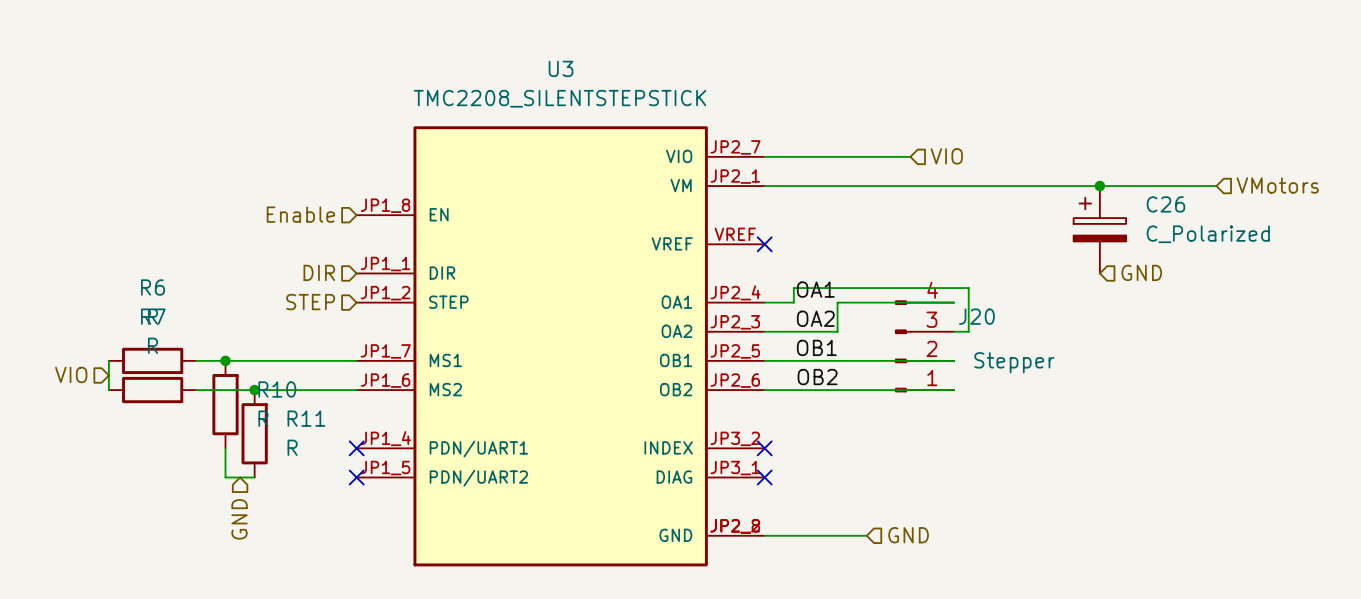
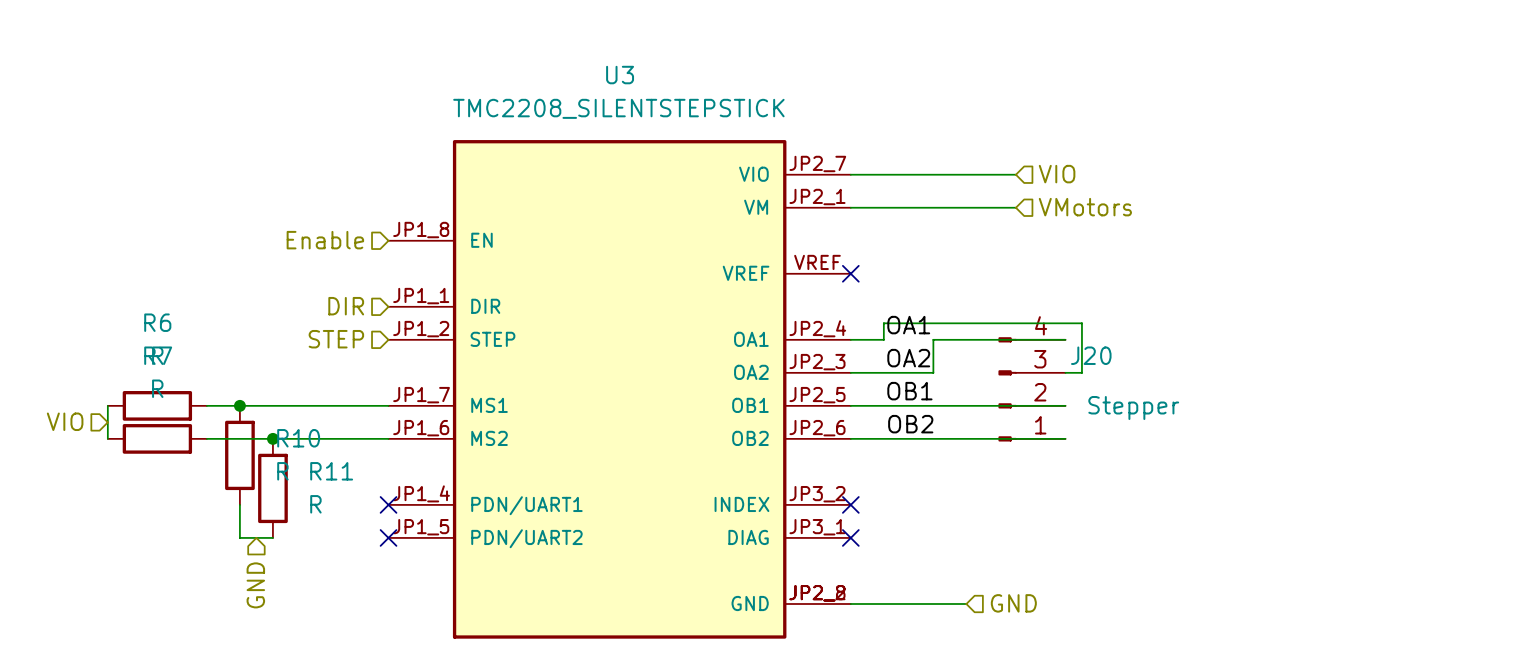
hierarchical label: none -> VMotors (1085, 207)
hierarchical label: VMotors (1277, 185) -> none
wire: (910, 186) (1216, 186) -> none
junction: (1099, 186) -> none
C26: C_Polarized (1099, 229) -> none
hierarchical label: GND (1141, 272) -> none

